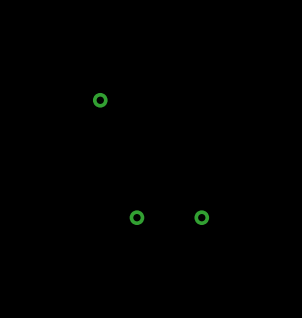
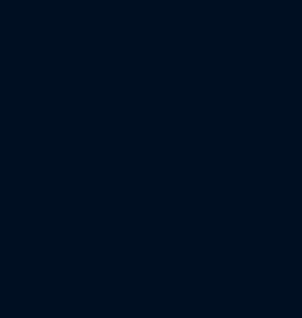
via: (100, 100) -> none
via: (136, 217) -> none
via: (201, 217) -> none

